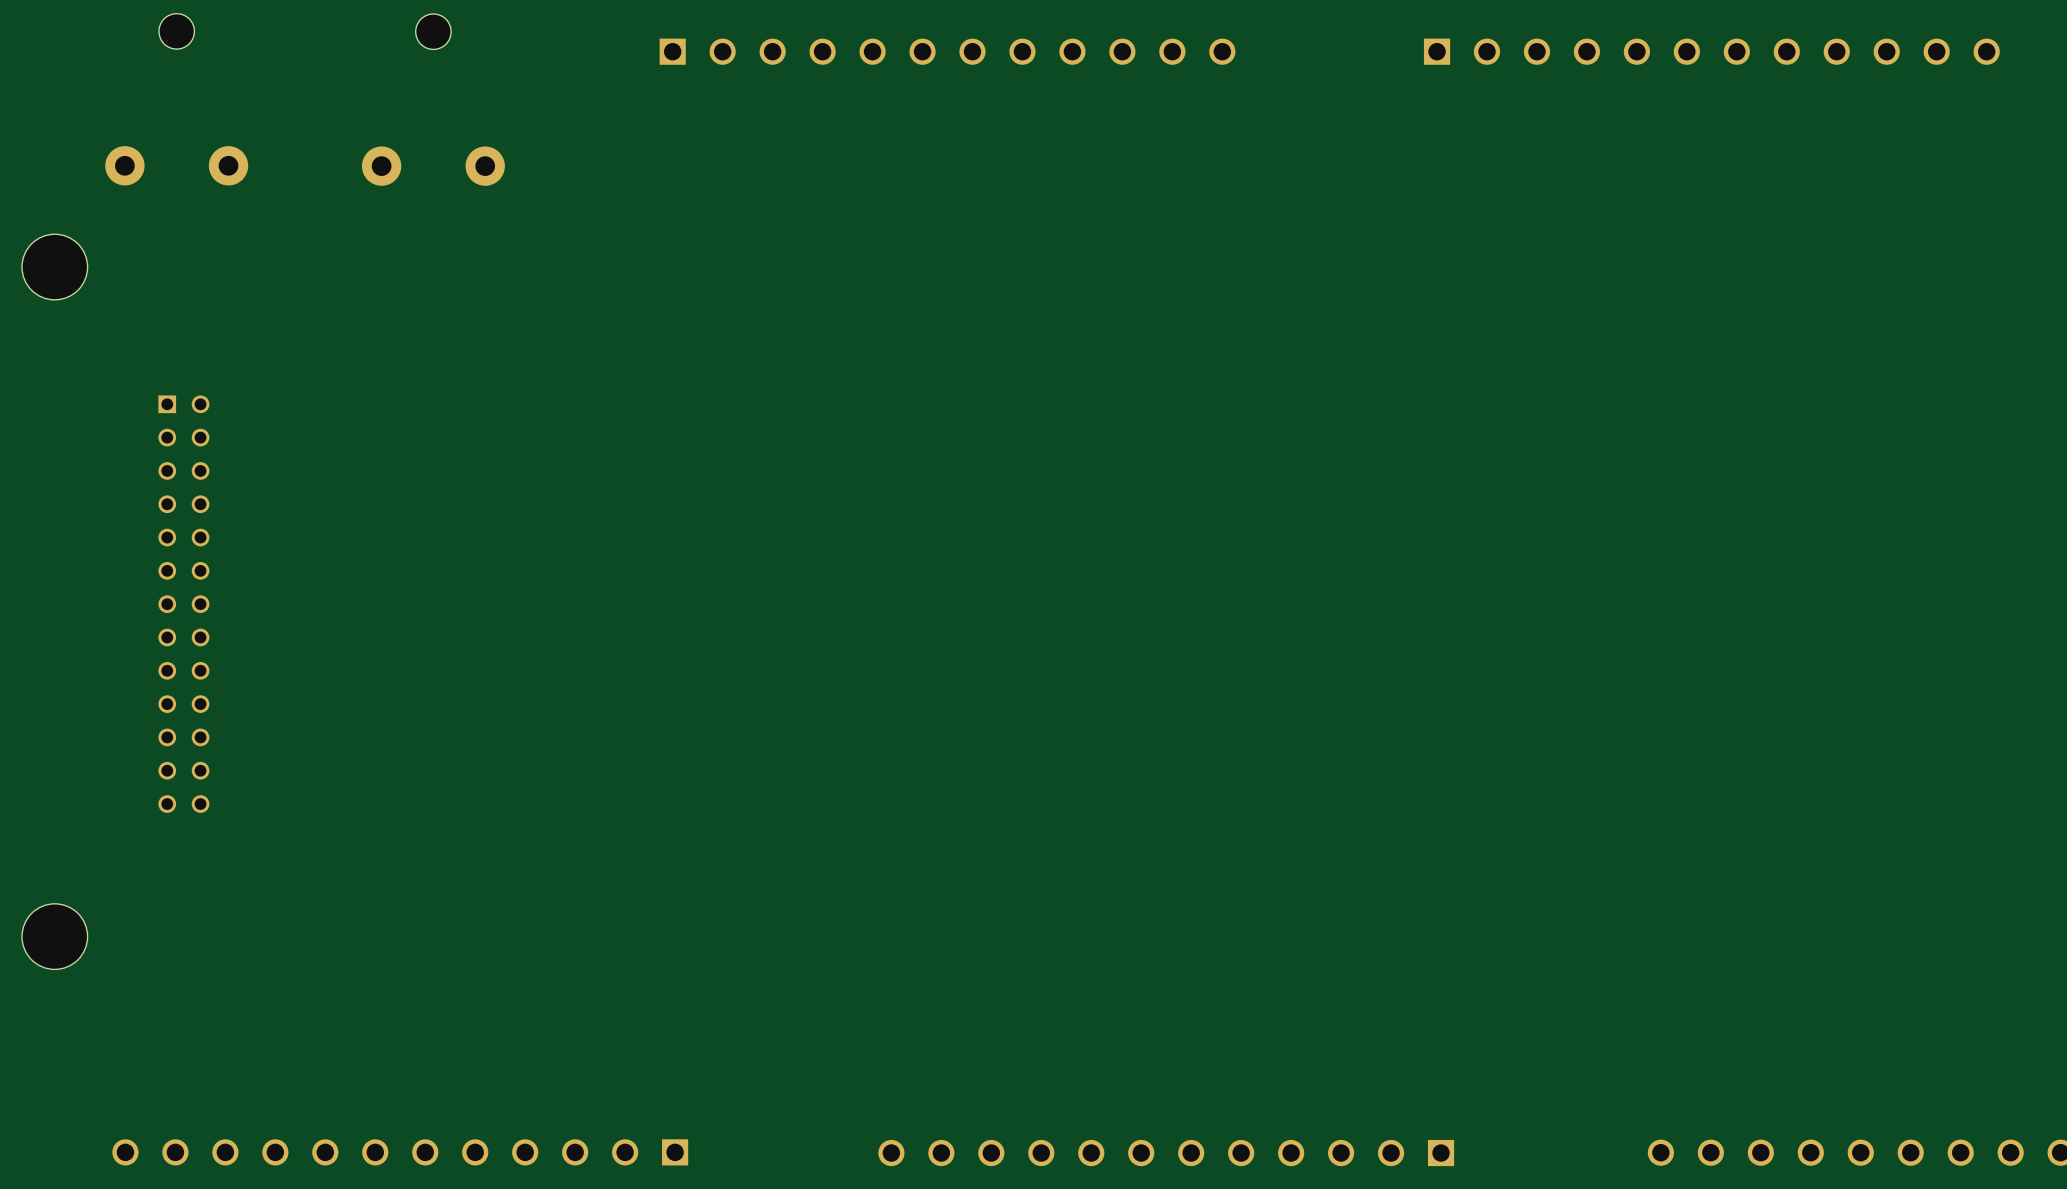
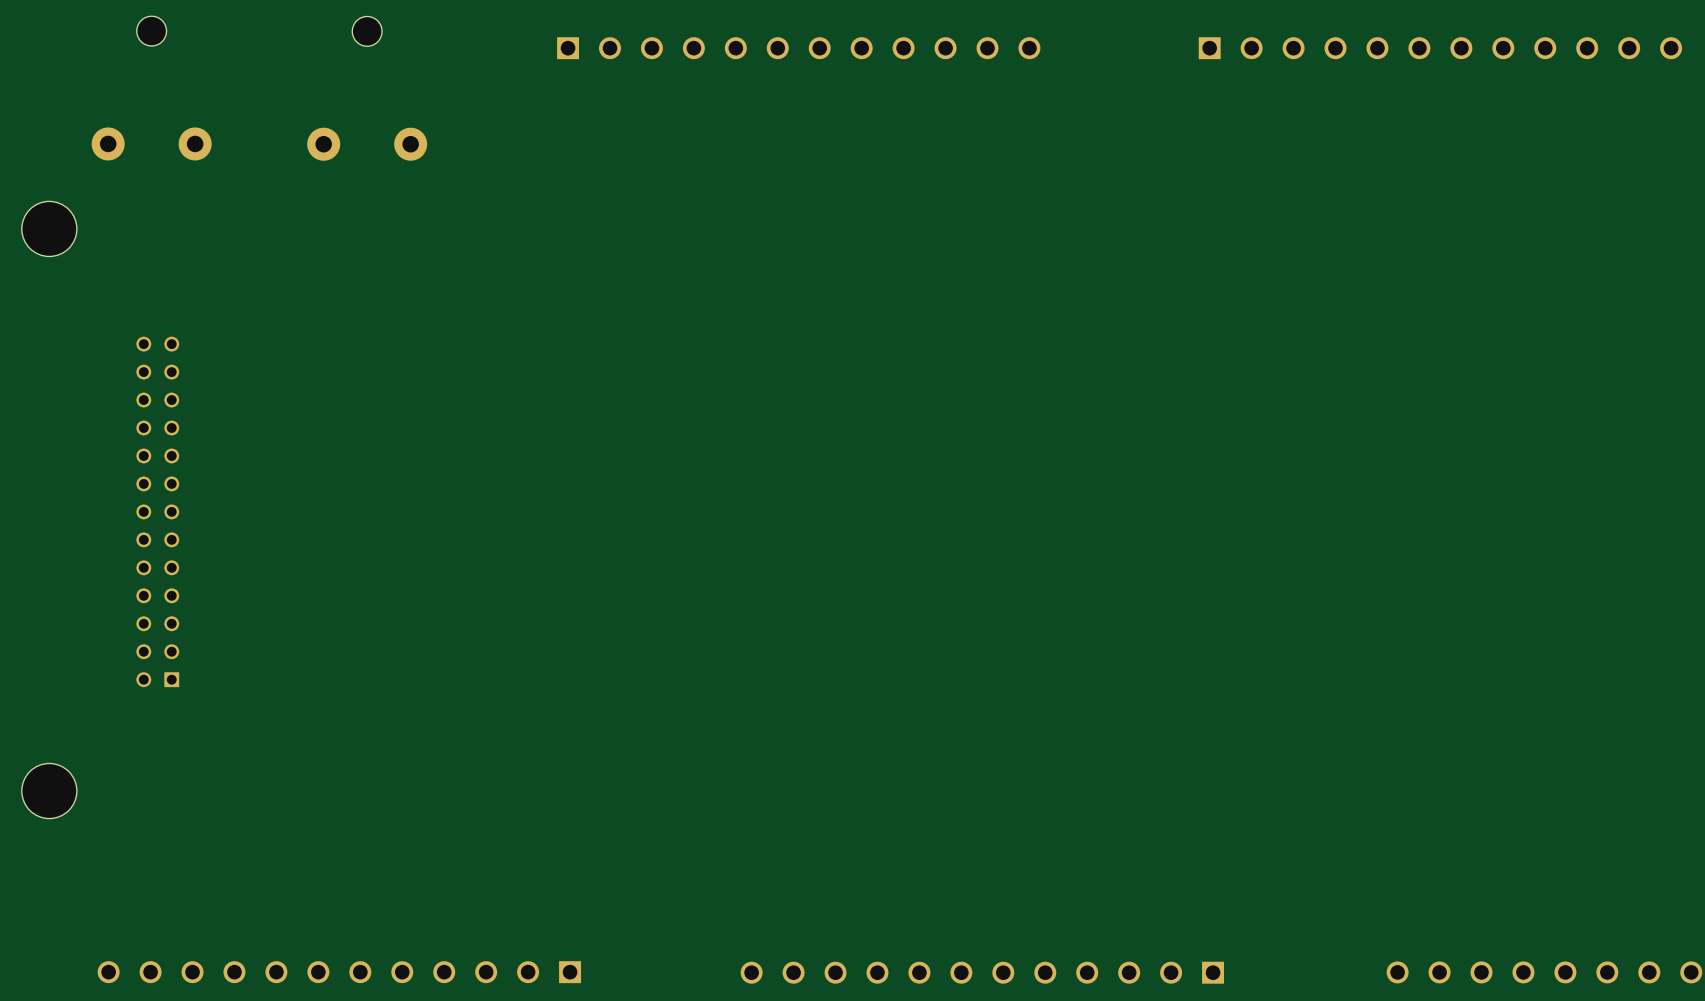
part rotation: 0° (183, 604) -> 180° (157, 511)

